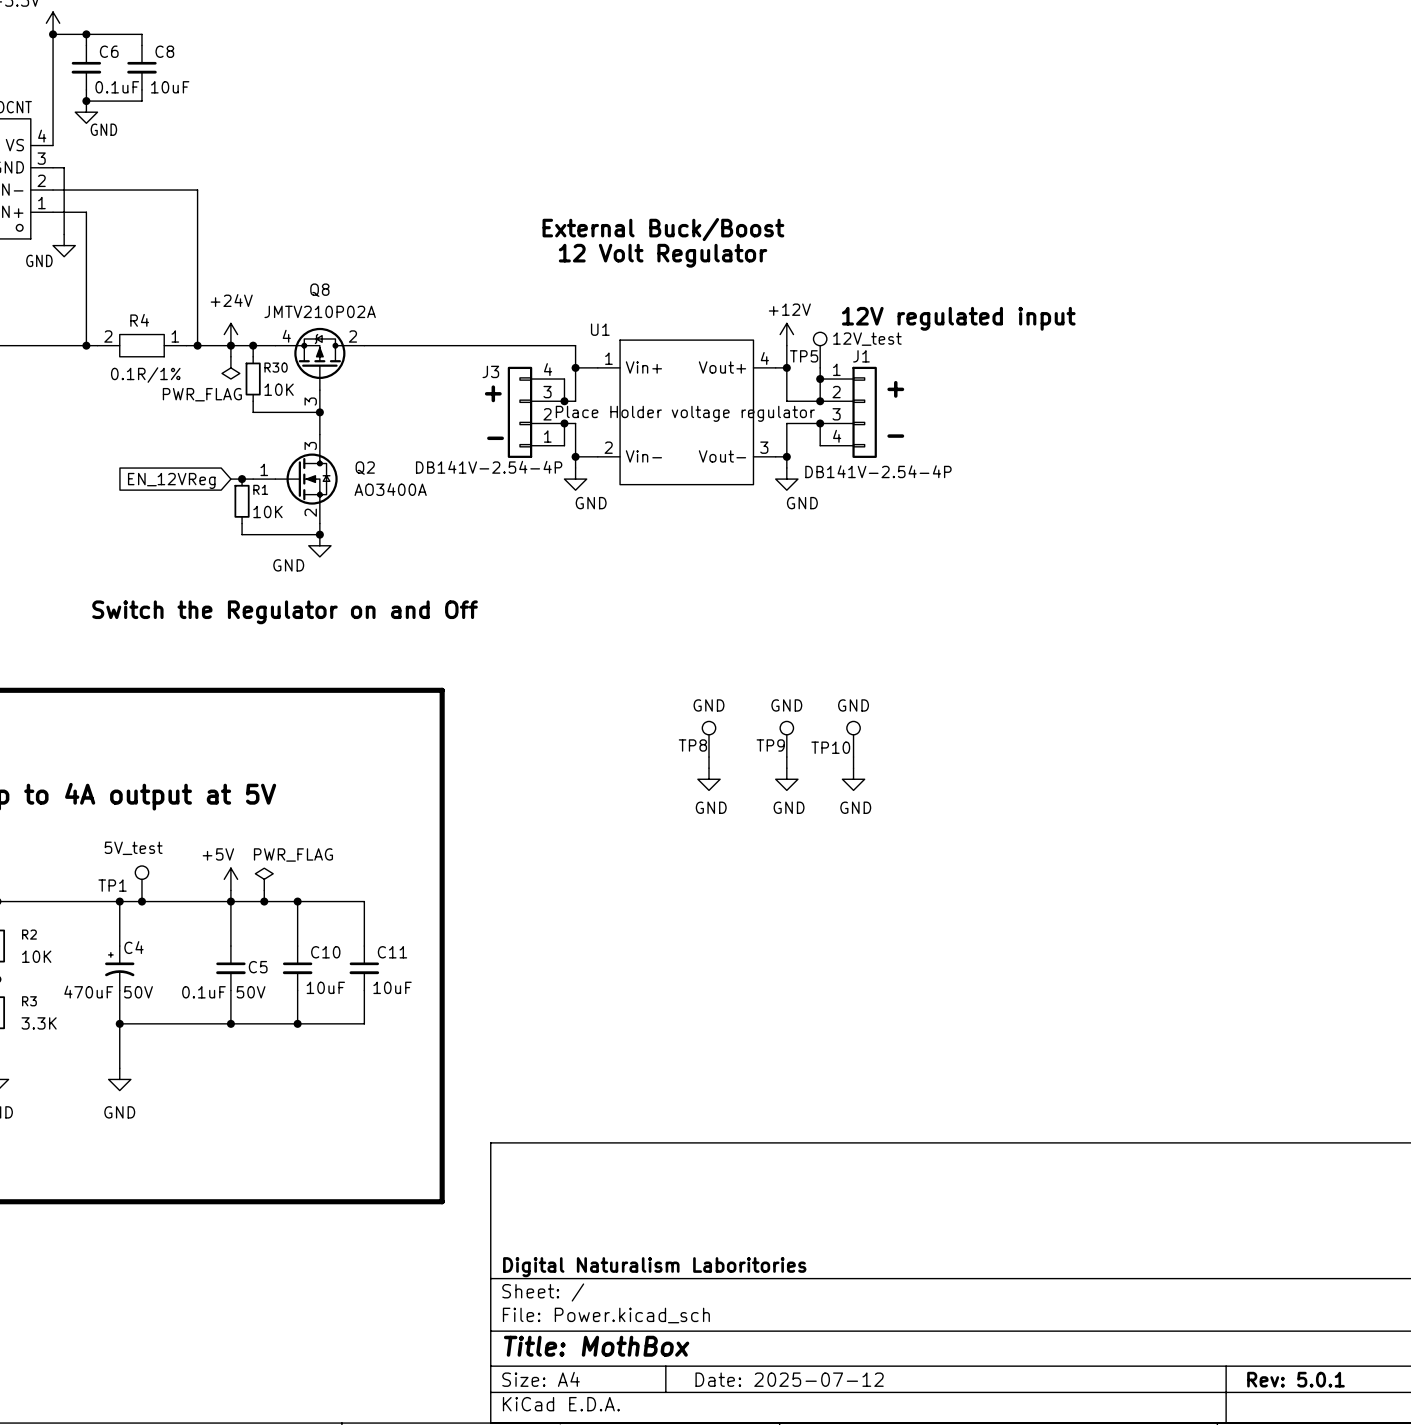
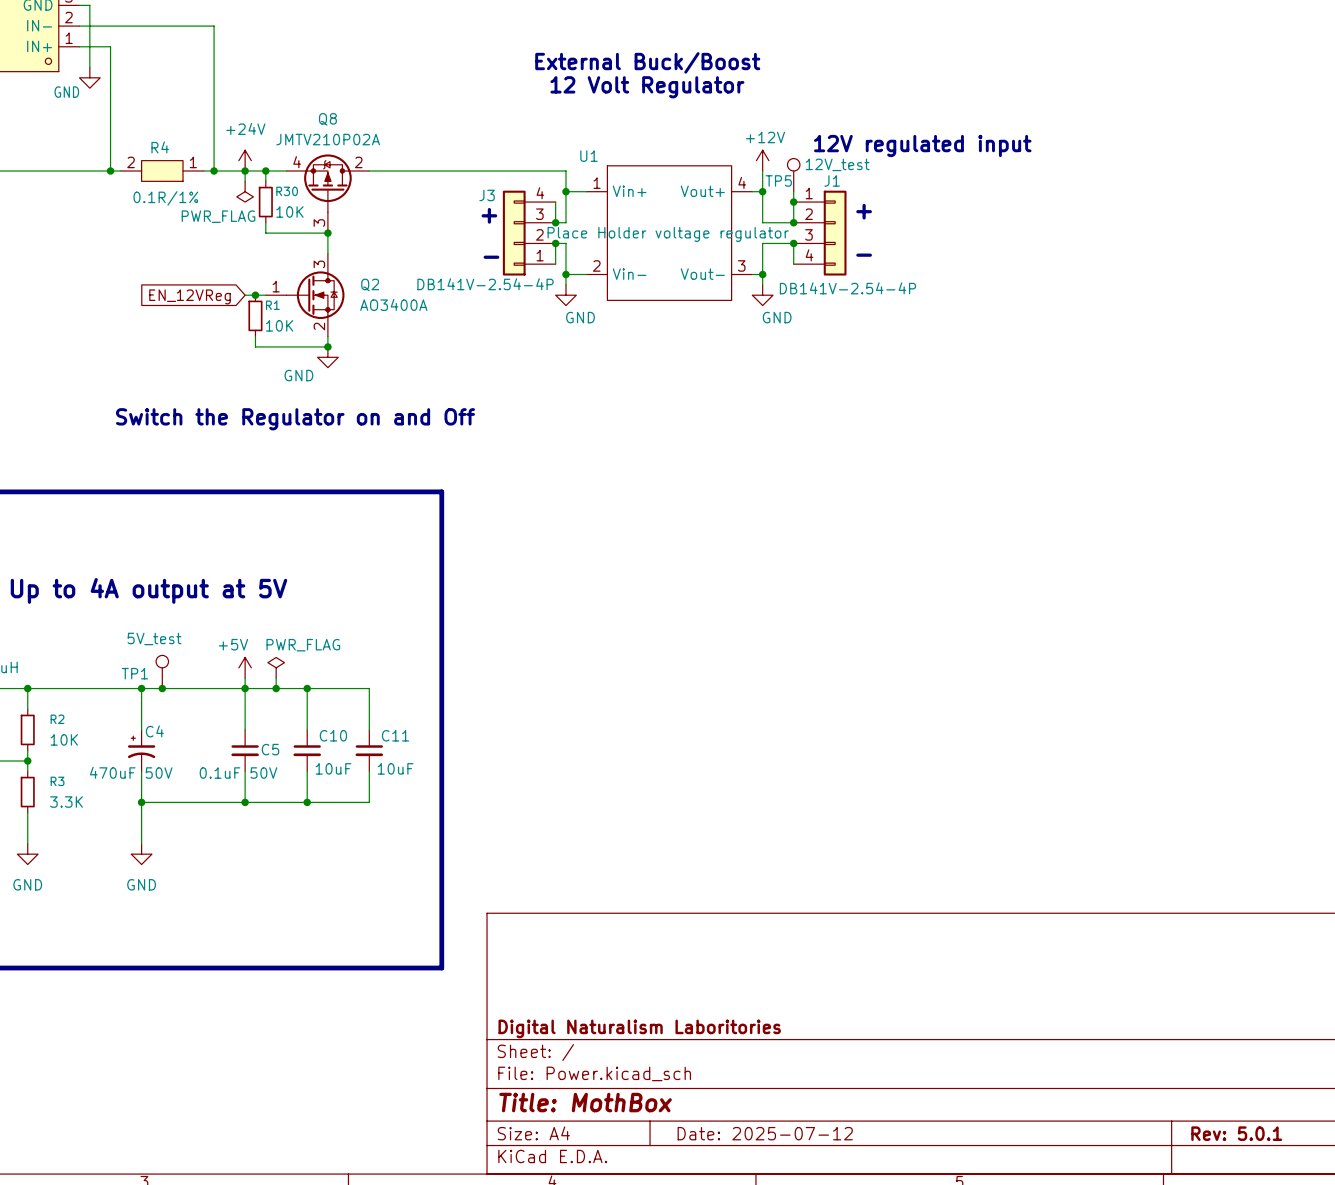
TP8: GND (709, 739) -> none
TP9: GND (786, 739) -> none
TP10: GND (853, 739) -> none
wire: (709, 757) (709, 768) -> none
wire: (786, 757) (786, 768) -> none
wire: (853, 757) (853, 768) -> none
power symbol: GND (709, 779) -> none
power symbol: GND (786, 779) -> none
power symbol: GND (853, 779) -> none

